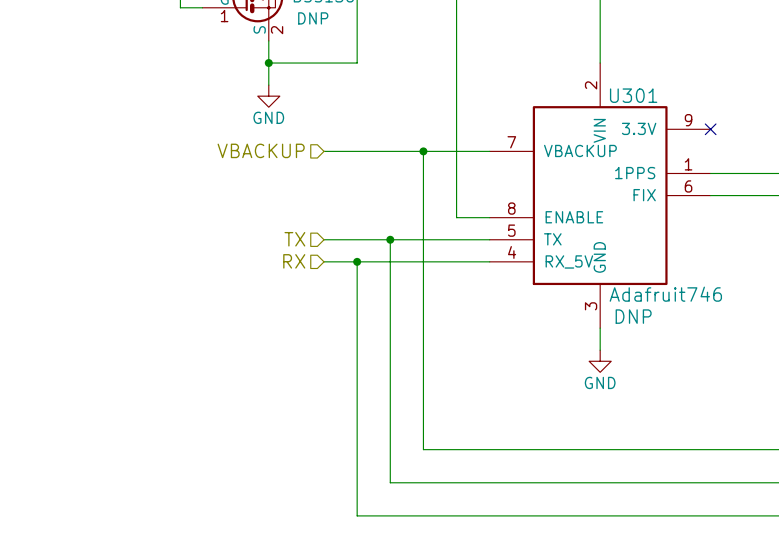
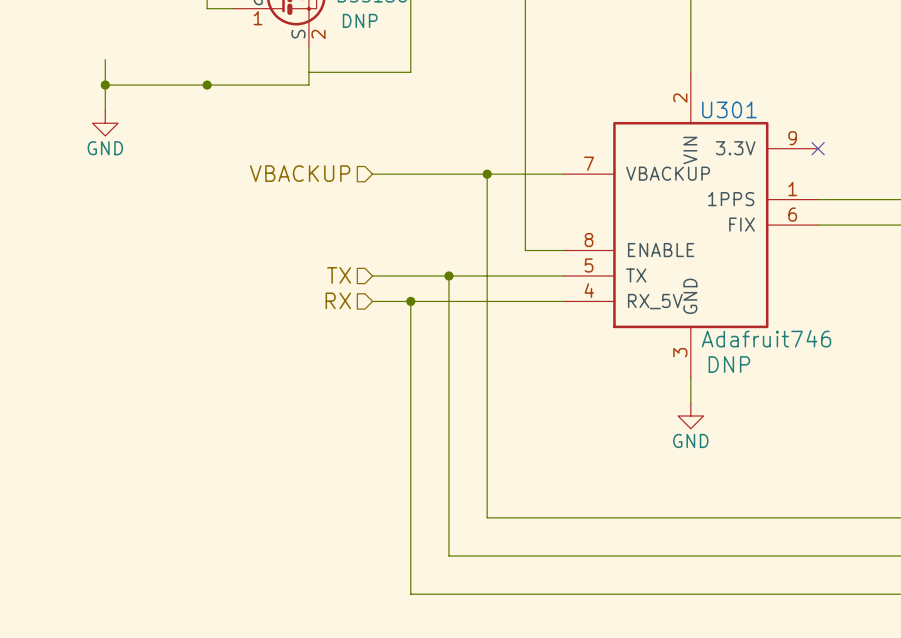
wire: none -> (105, 59) (105, 110)
junction: (268, 63) -> none
junction: none -> (105, 85)
junction: none -> (207, 85)
wire: (268, 74) (268, 85) -> (308, 85) (105, 85)
power symbol: GND (268, 96) -> none
power symbol: none -> GND (105, 123)

